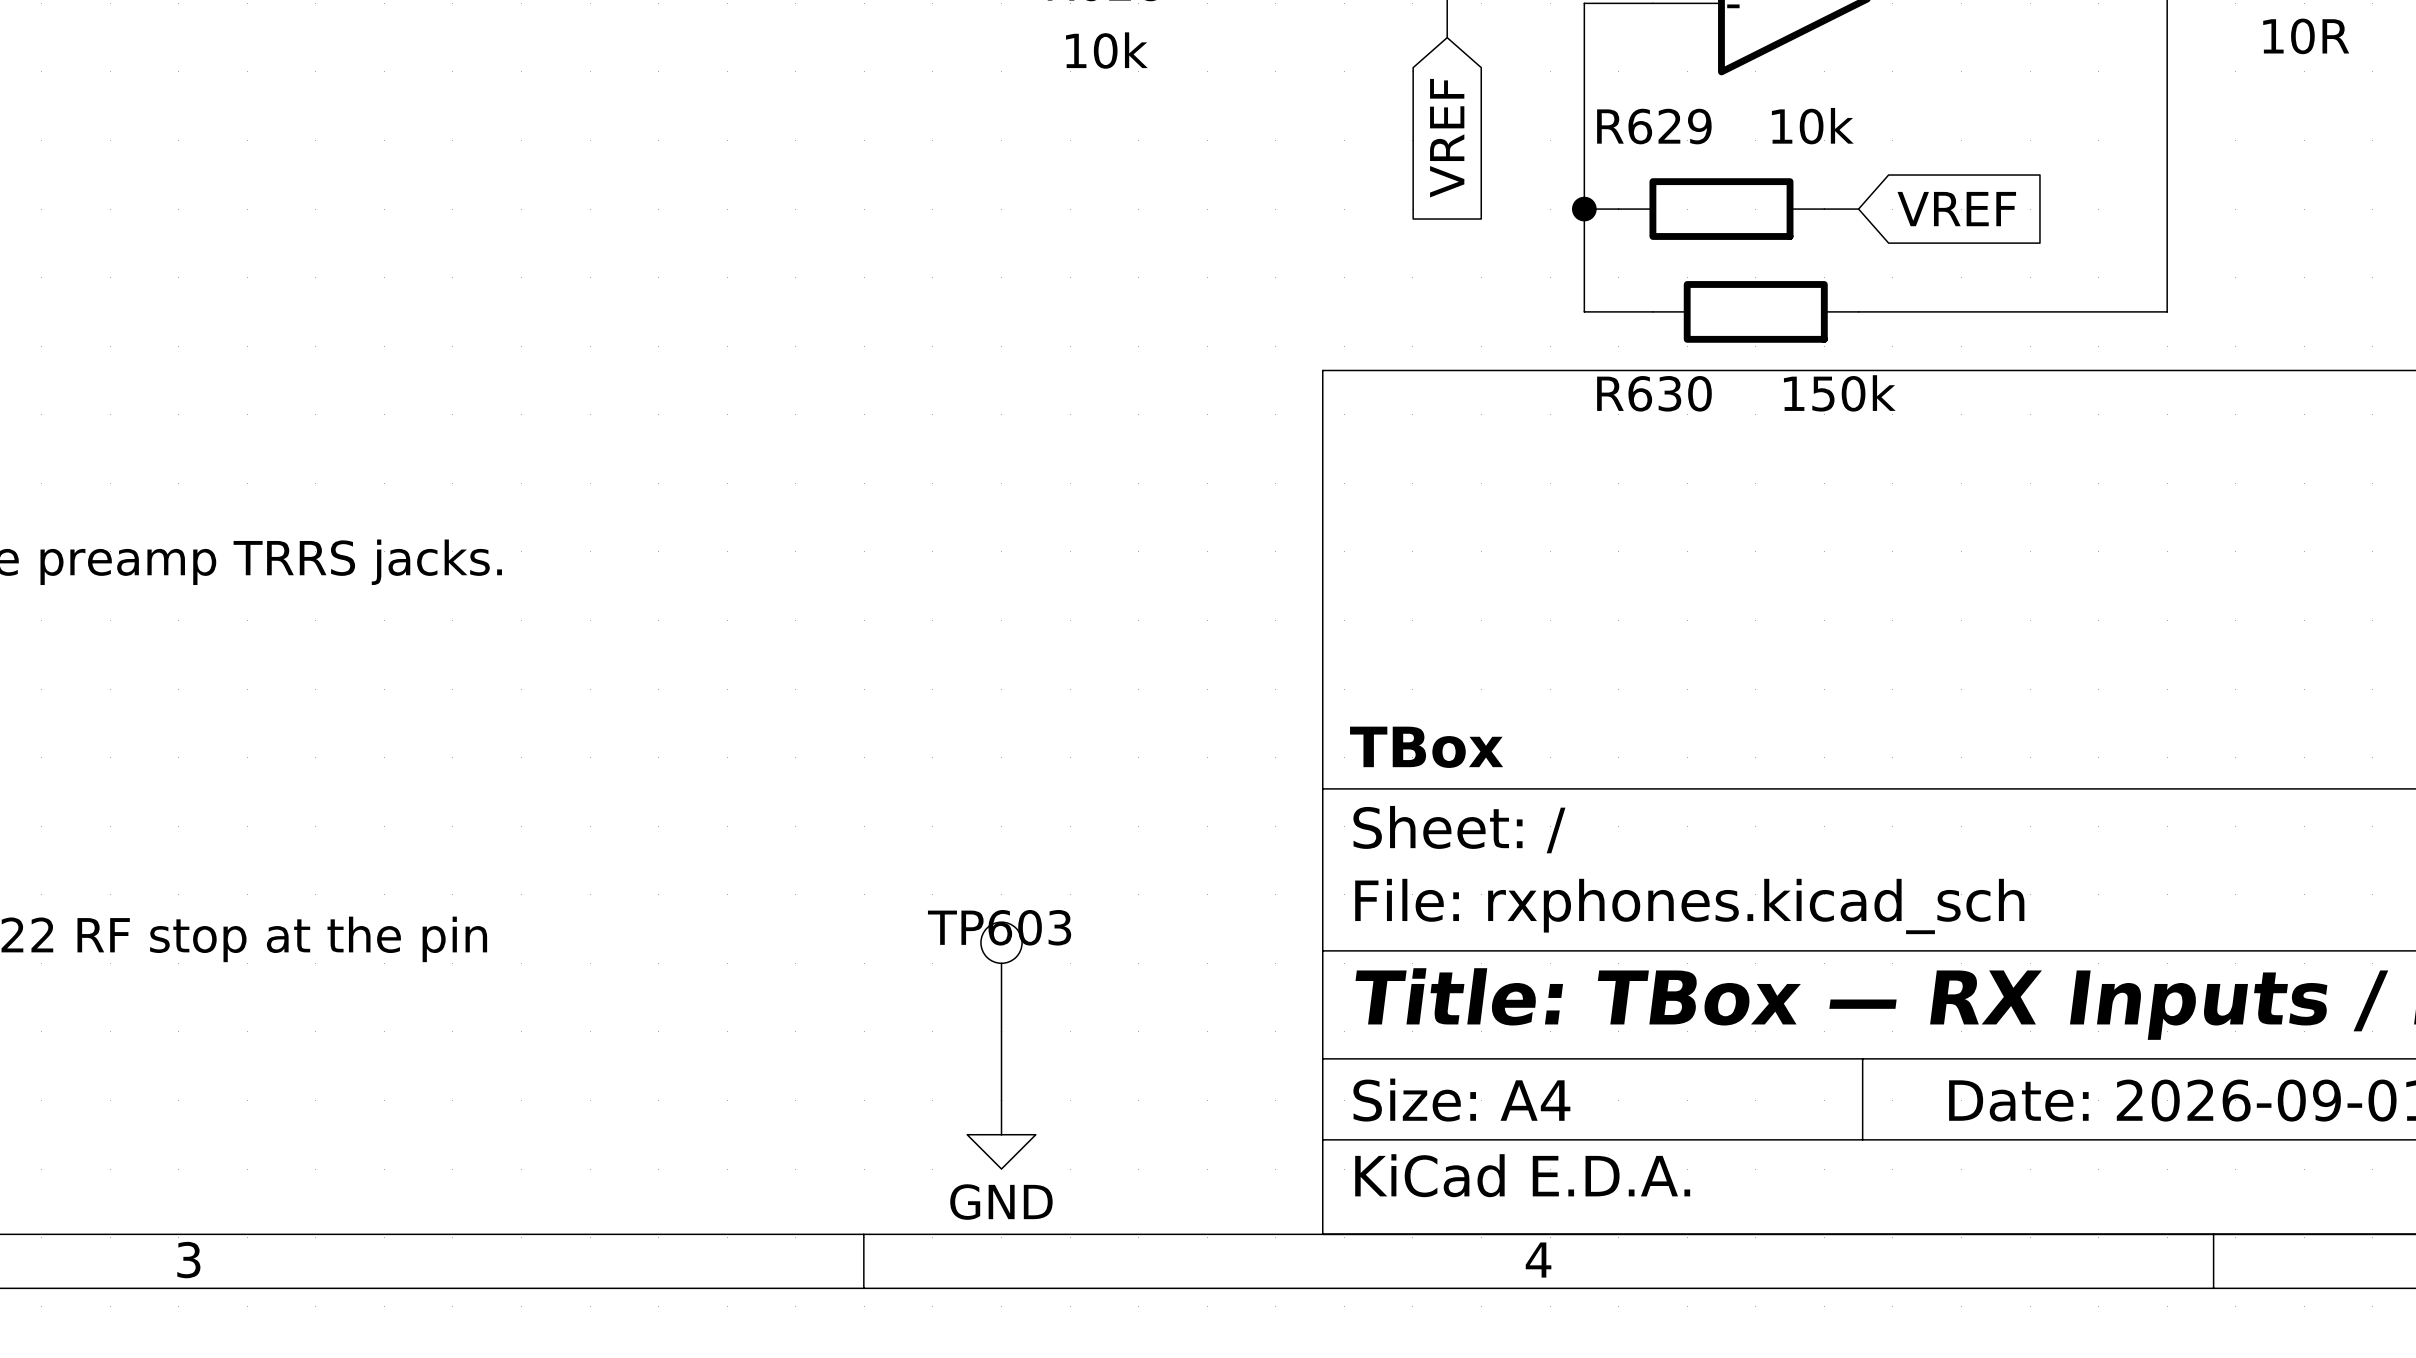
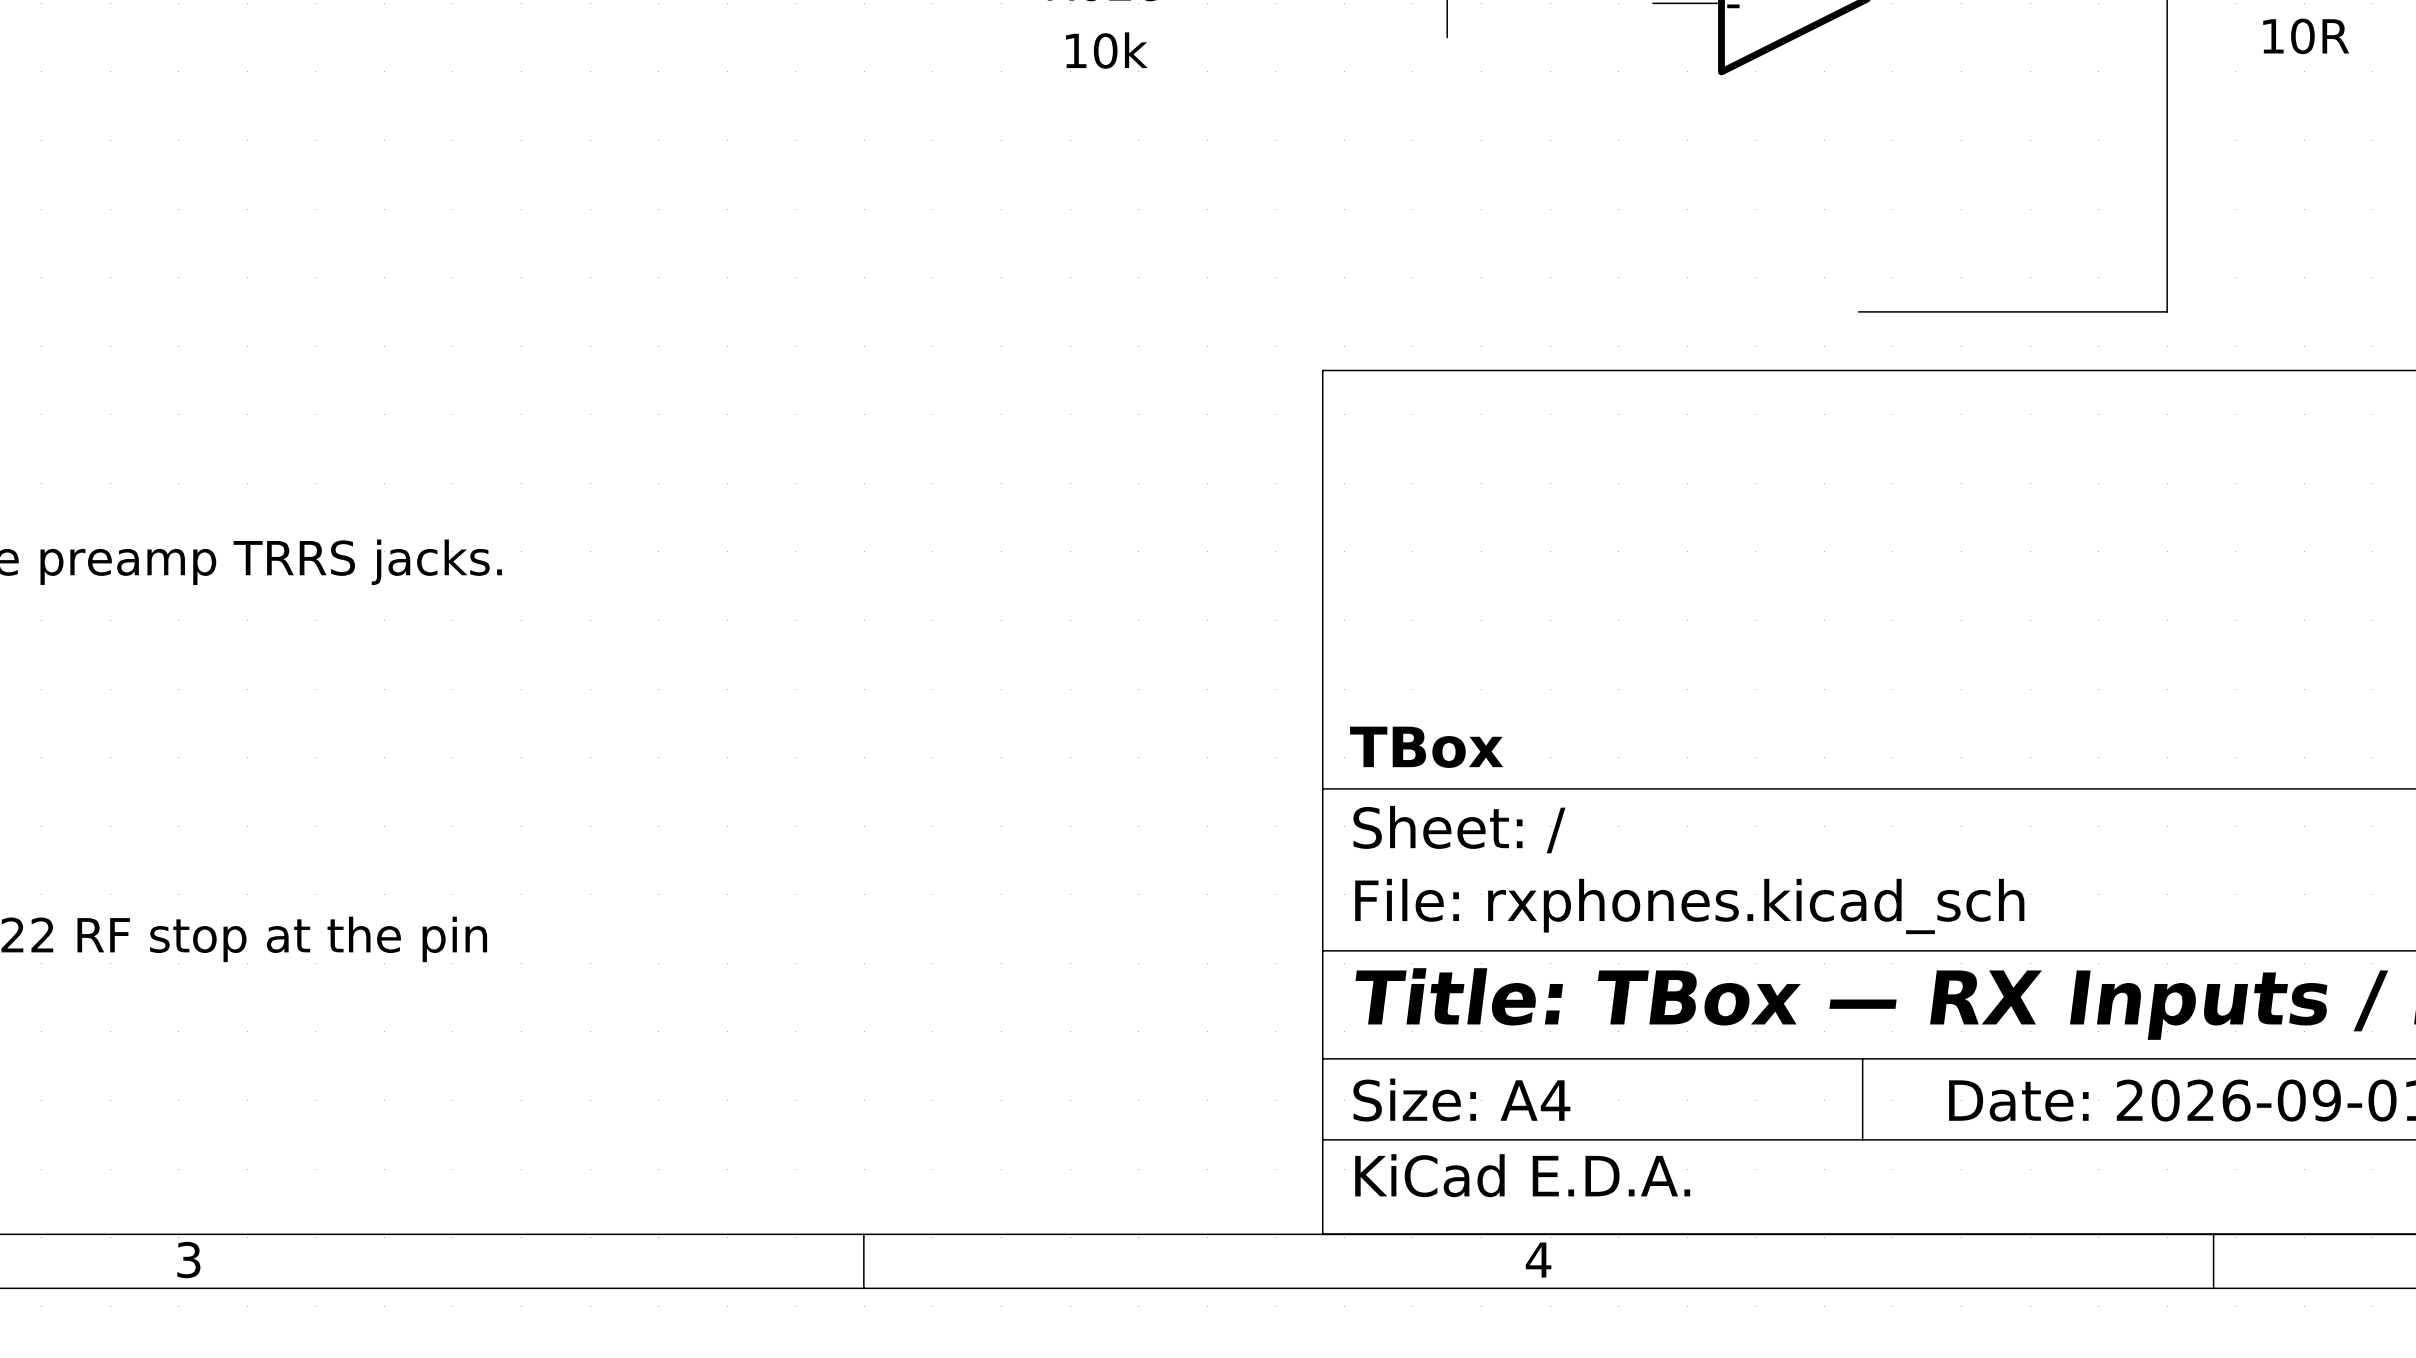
wire: (1652, 3) (1584, 3) (1584, 311) (1652, 311) -> none
global label: VREF (1447, 138) -> none
wire: (1584, 209) (1618, 209) -> none
junction: (1584, 209) -> none
R629: 10k (1721, 209) -> none
wire: (1824, 209) (1858, 209) -> none
global label: VREF (1956, 209) -> none
R630: 150k (1755, 311) -> none
TP603: (1001, 977) -> none
wire: (1001, 1031) (1001, 1100) -> none
power symbol: GND (1001, 1134) -> none

